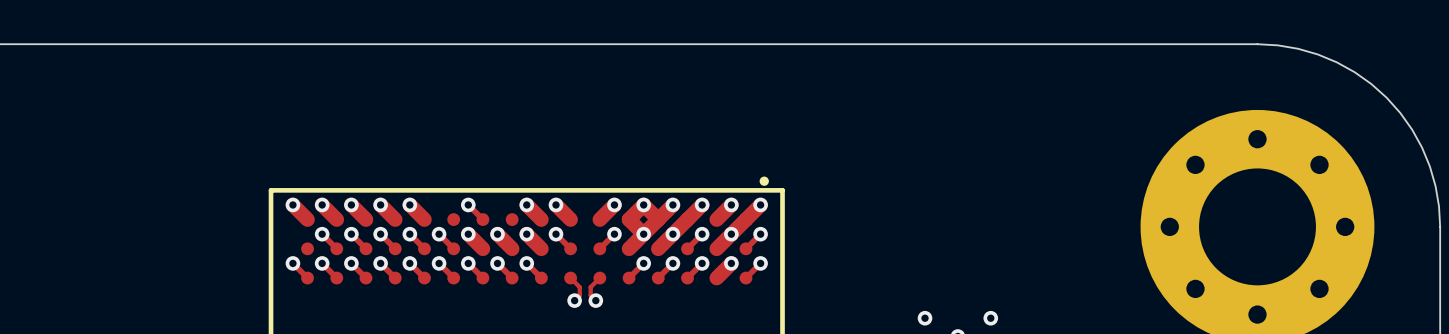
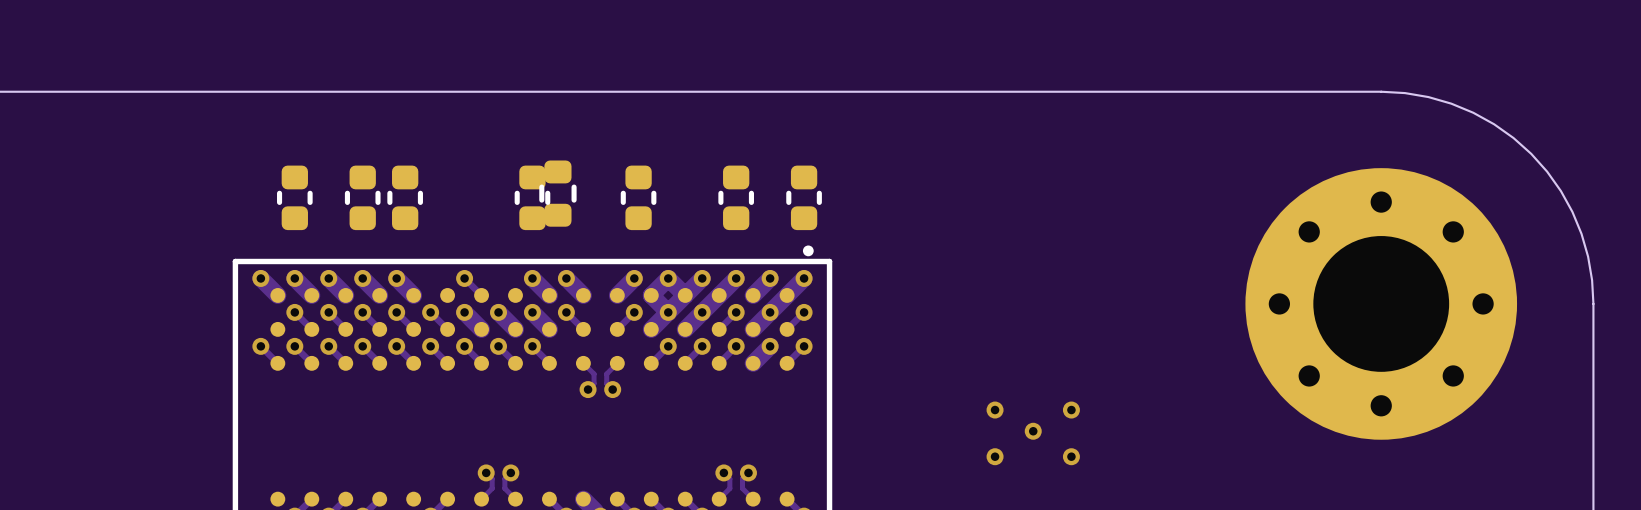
part: none -> (557, 193)
part: none -> (294, 197)
part: none -> (362, 197)
part: none -> (405, 197)
part: none -> (532, 197)
part: none -> (638, 197)
part: none -> (736, 197)
part: none -> (804, 197)

